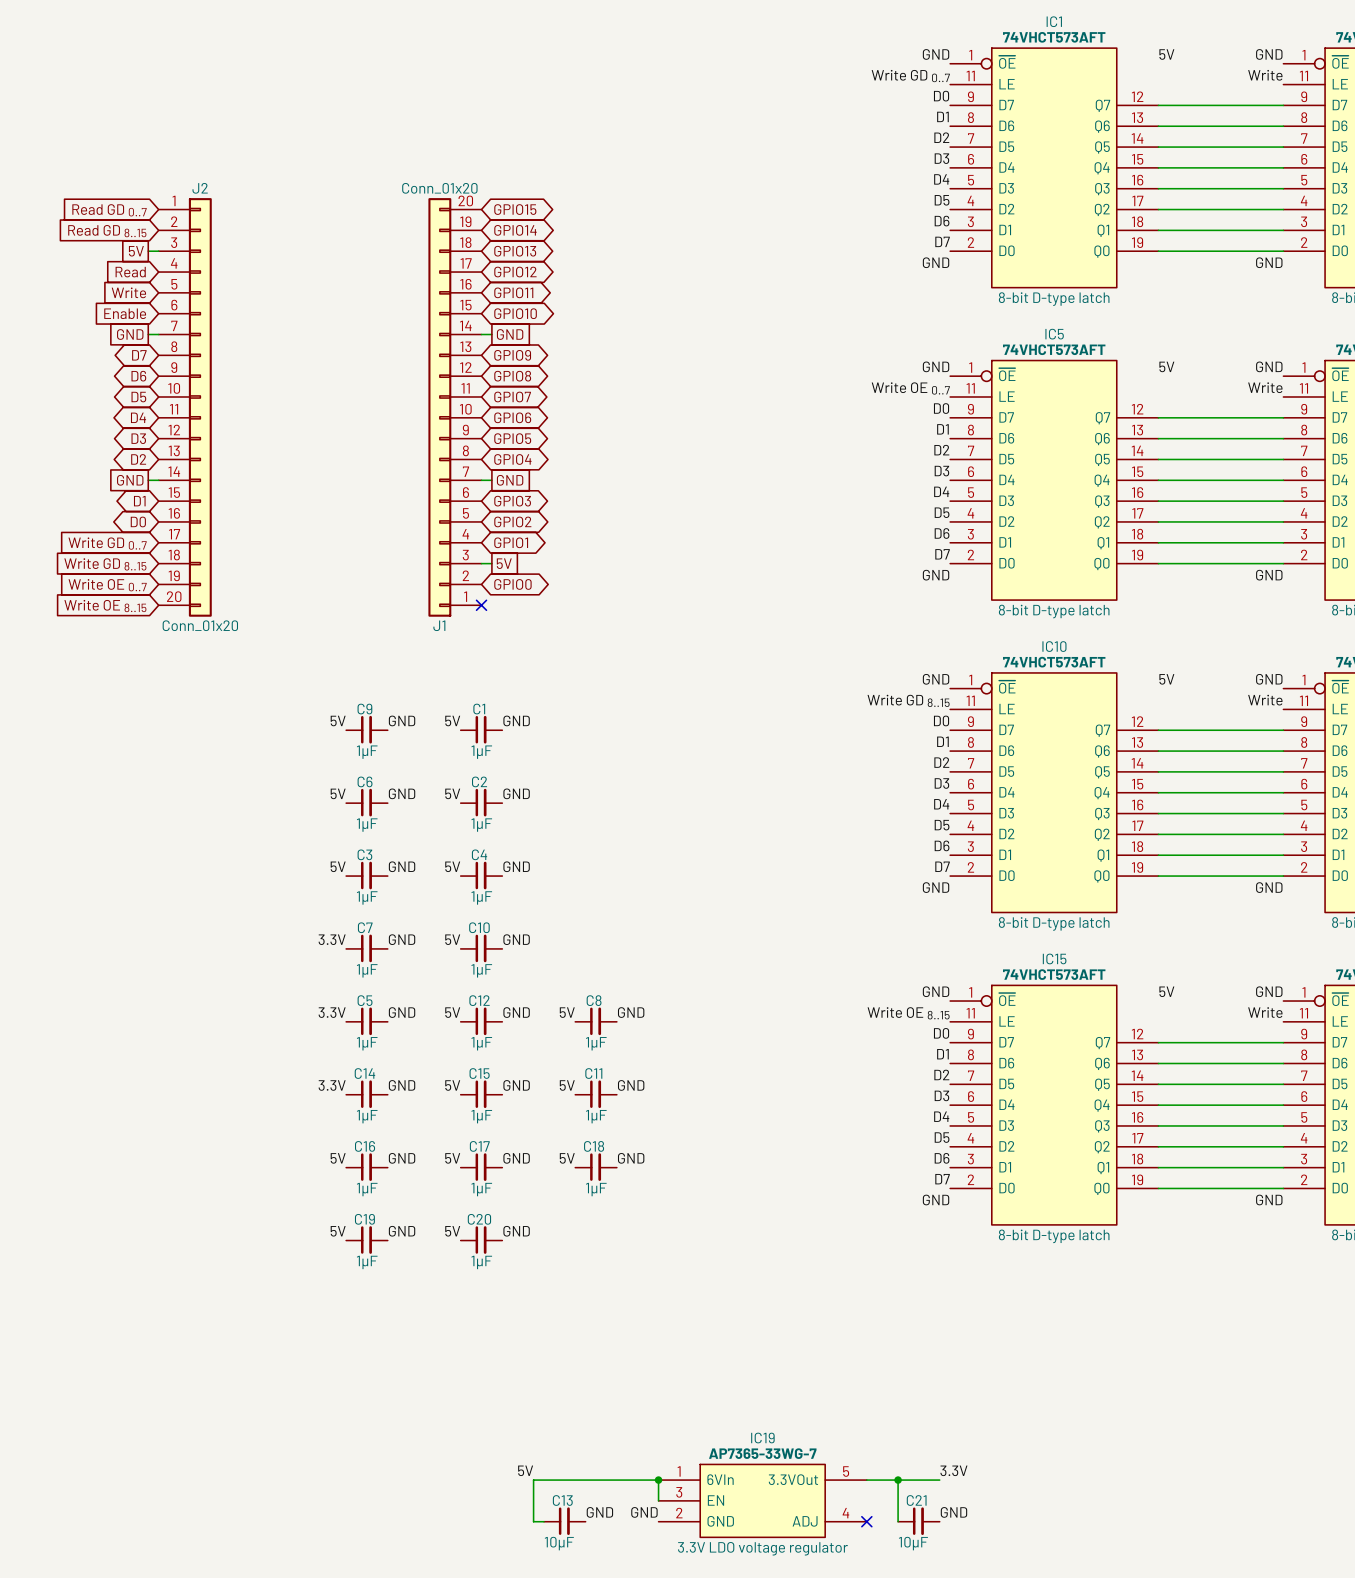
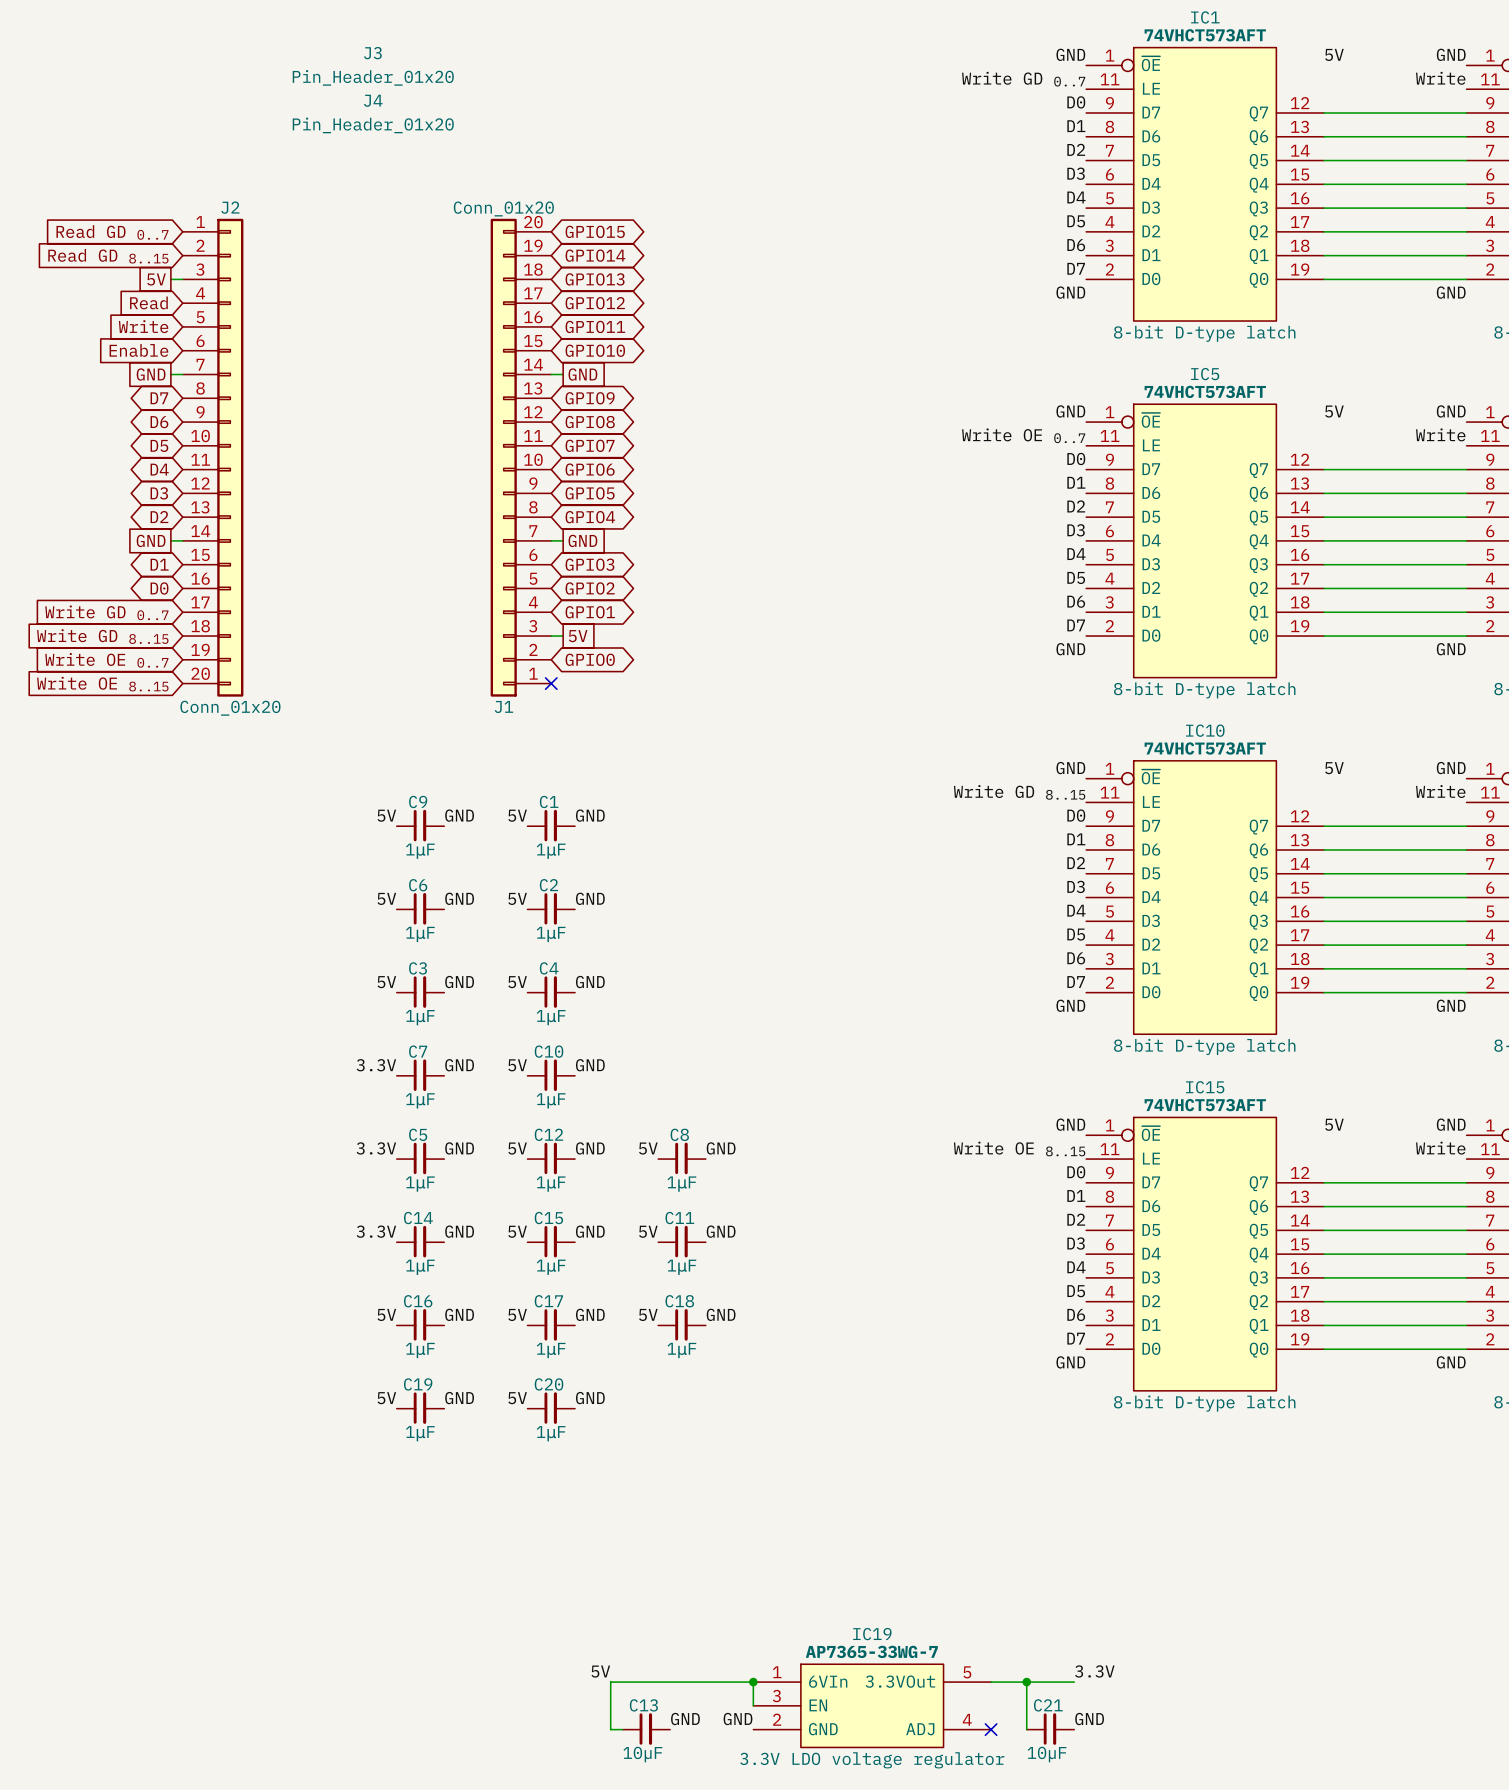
J3: none -> Pin_Header_01x20 (373, 66)
J4: none -> Pin_Header_01x20 (373, 113)

